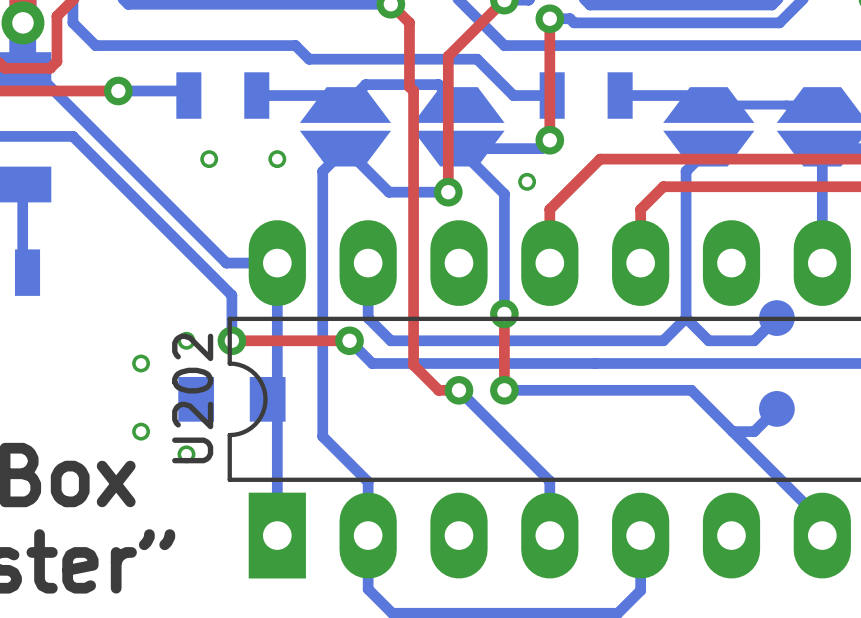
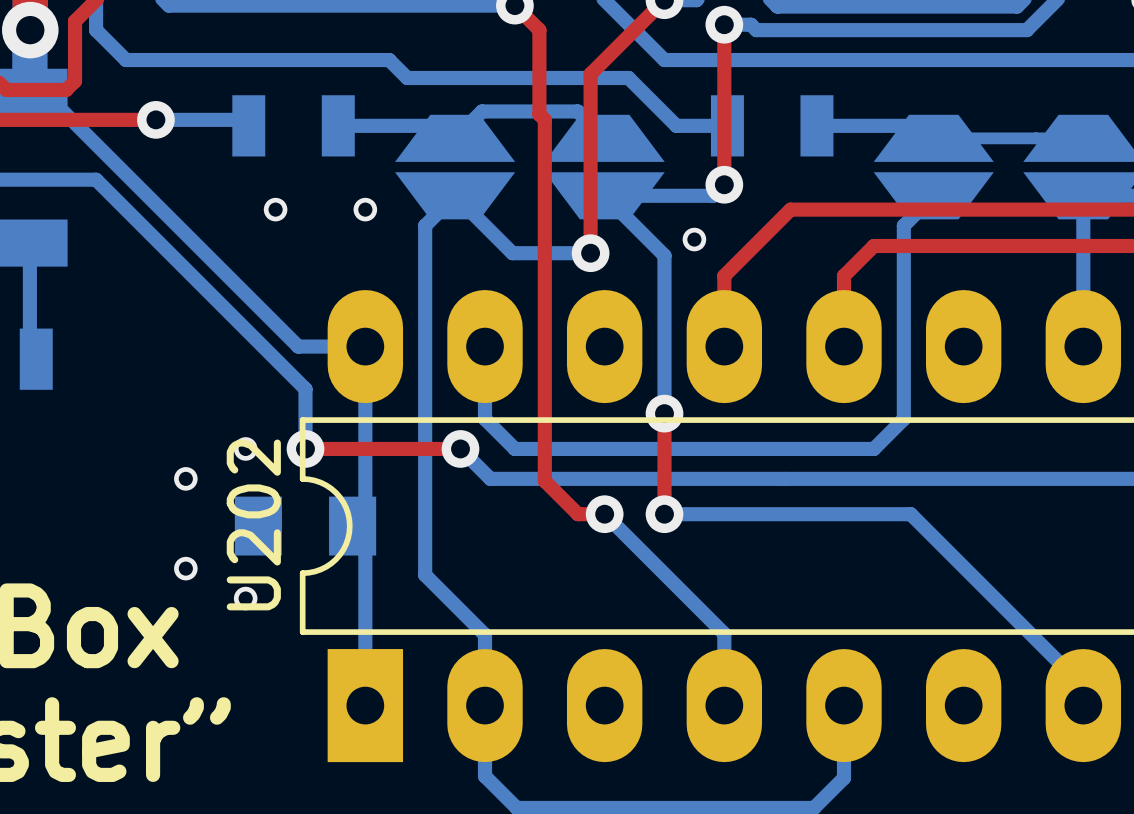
bottom track: (686, 318) (708, 340) (754, 340) (776, 318) -> none
part: (776, 318) -> none
bottom track: (776, 408) (754, 431) (732, 431) -> none
part: (776, 408) -> none

